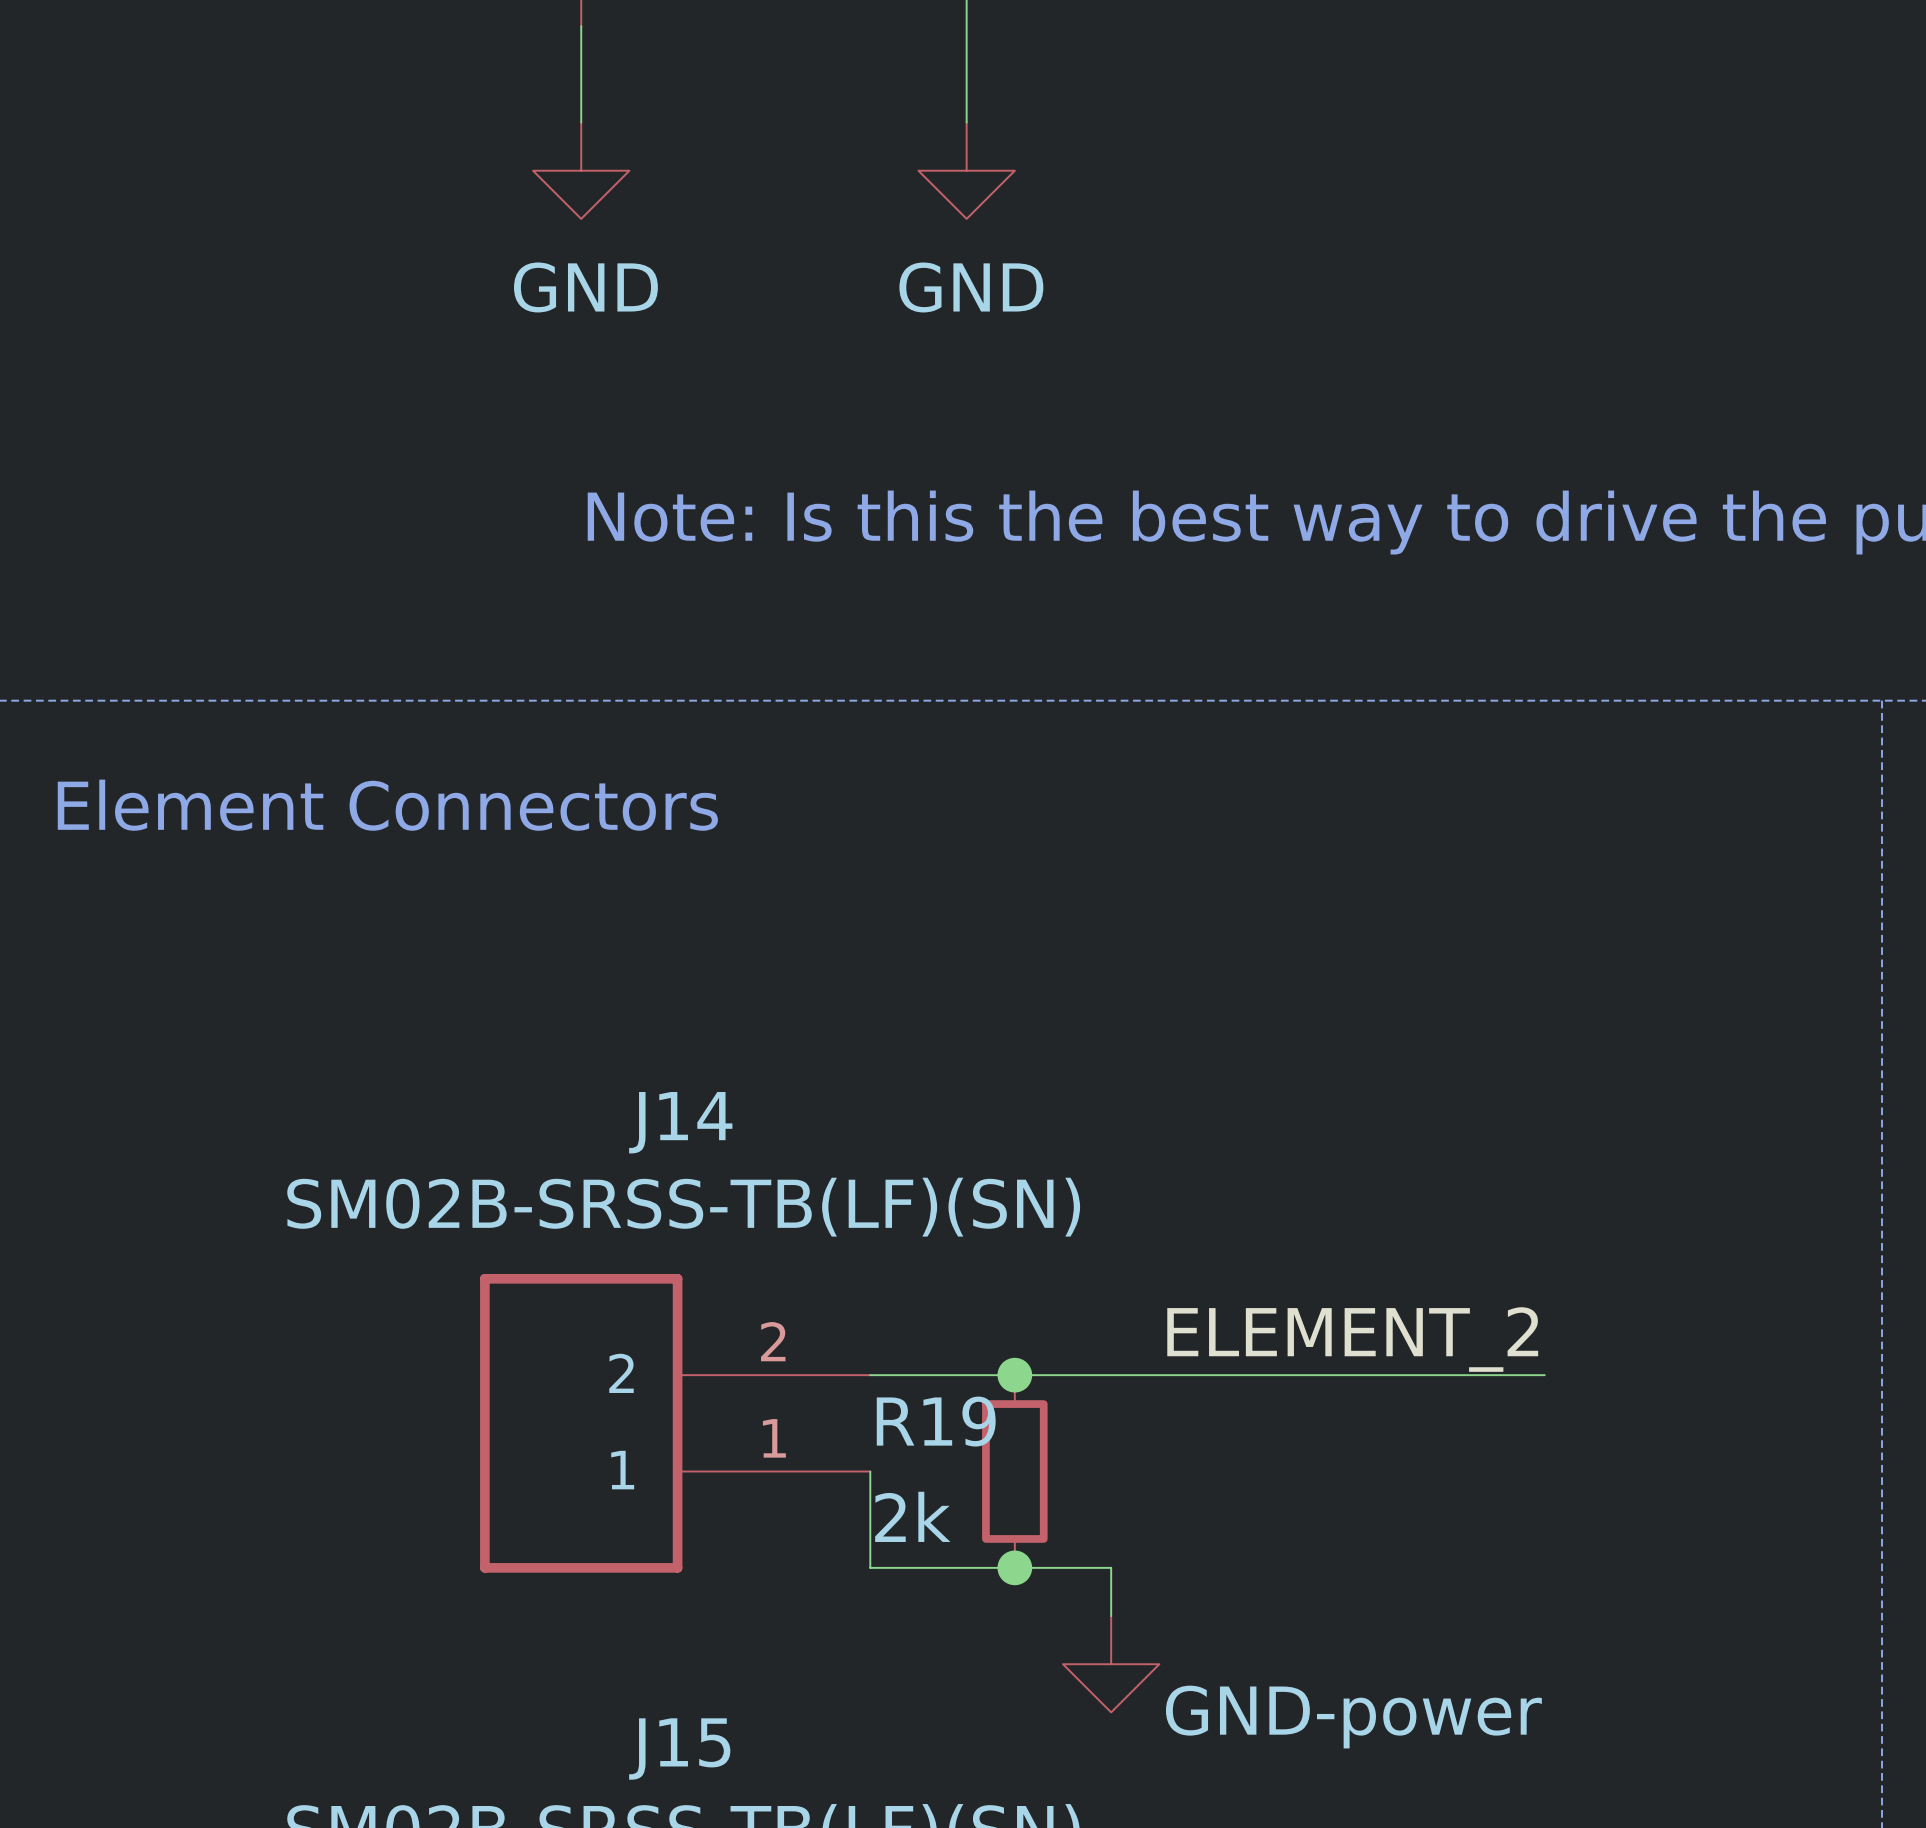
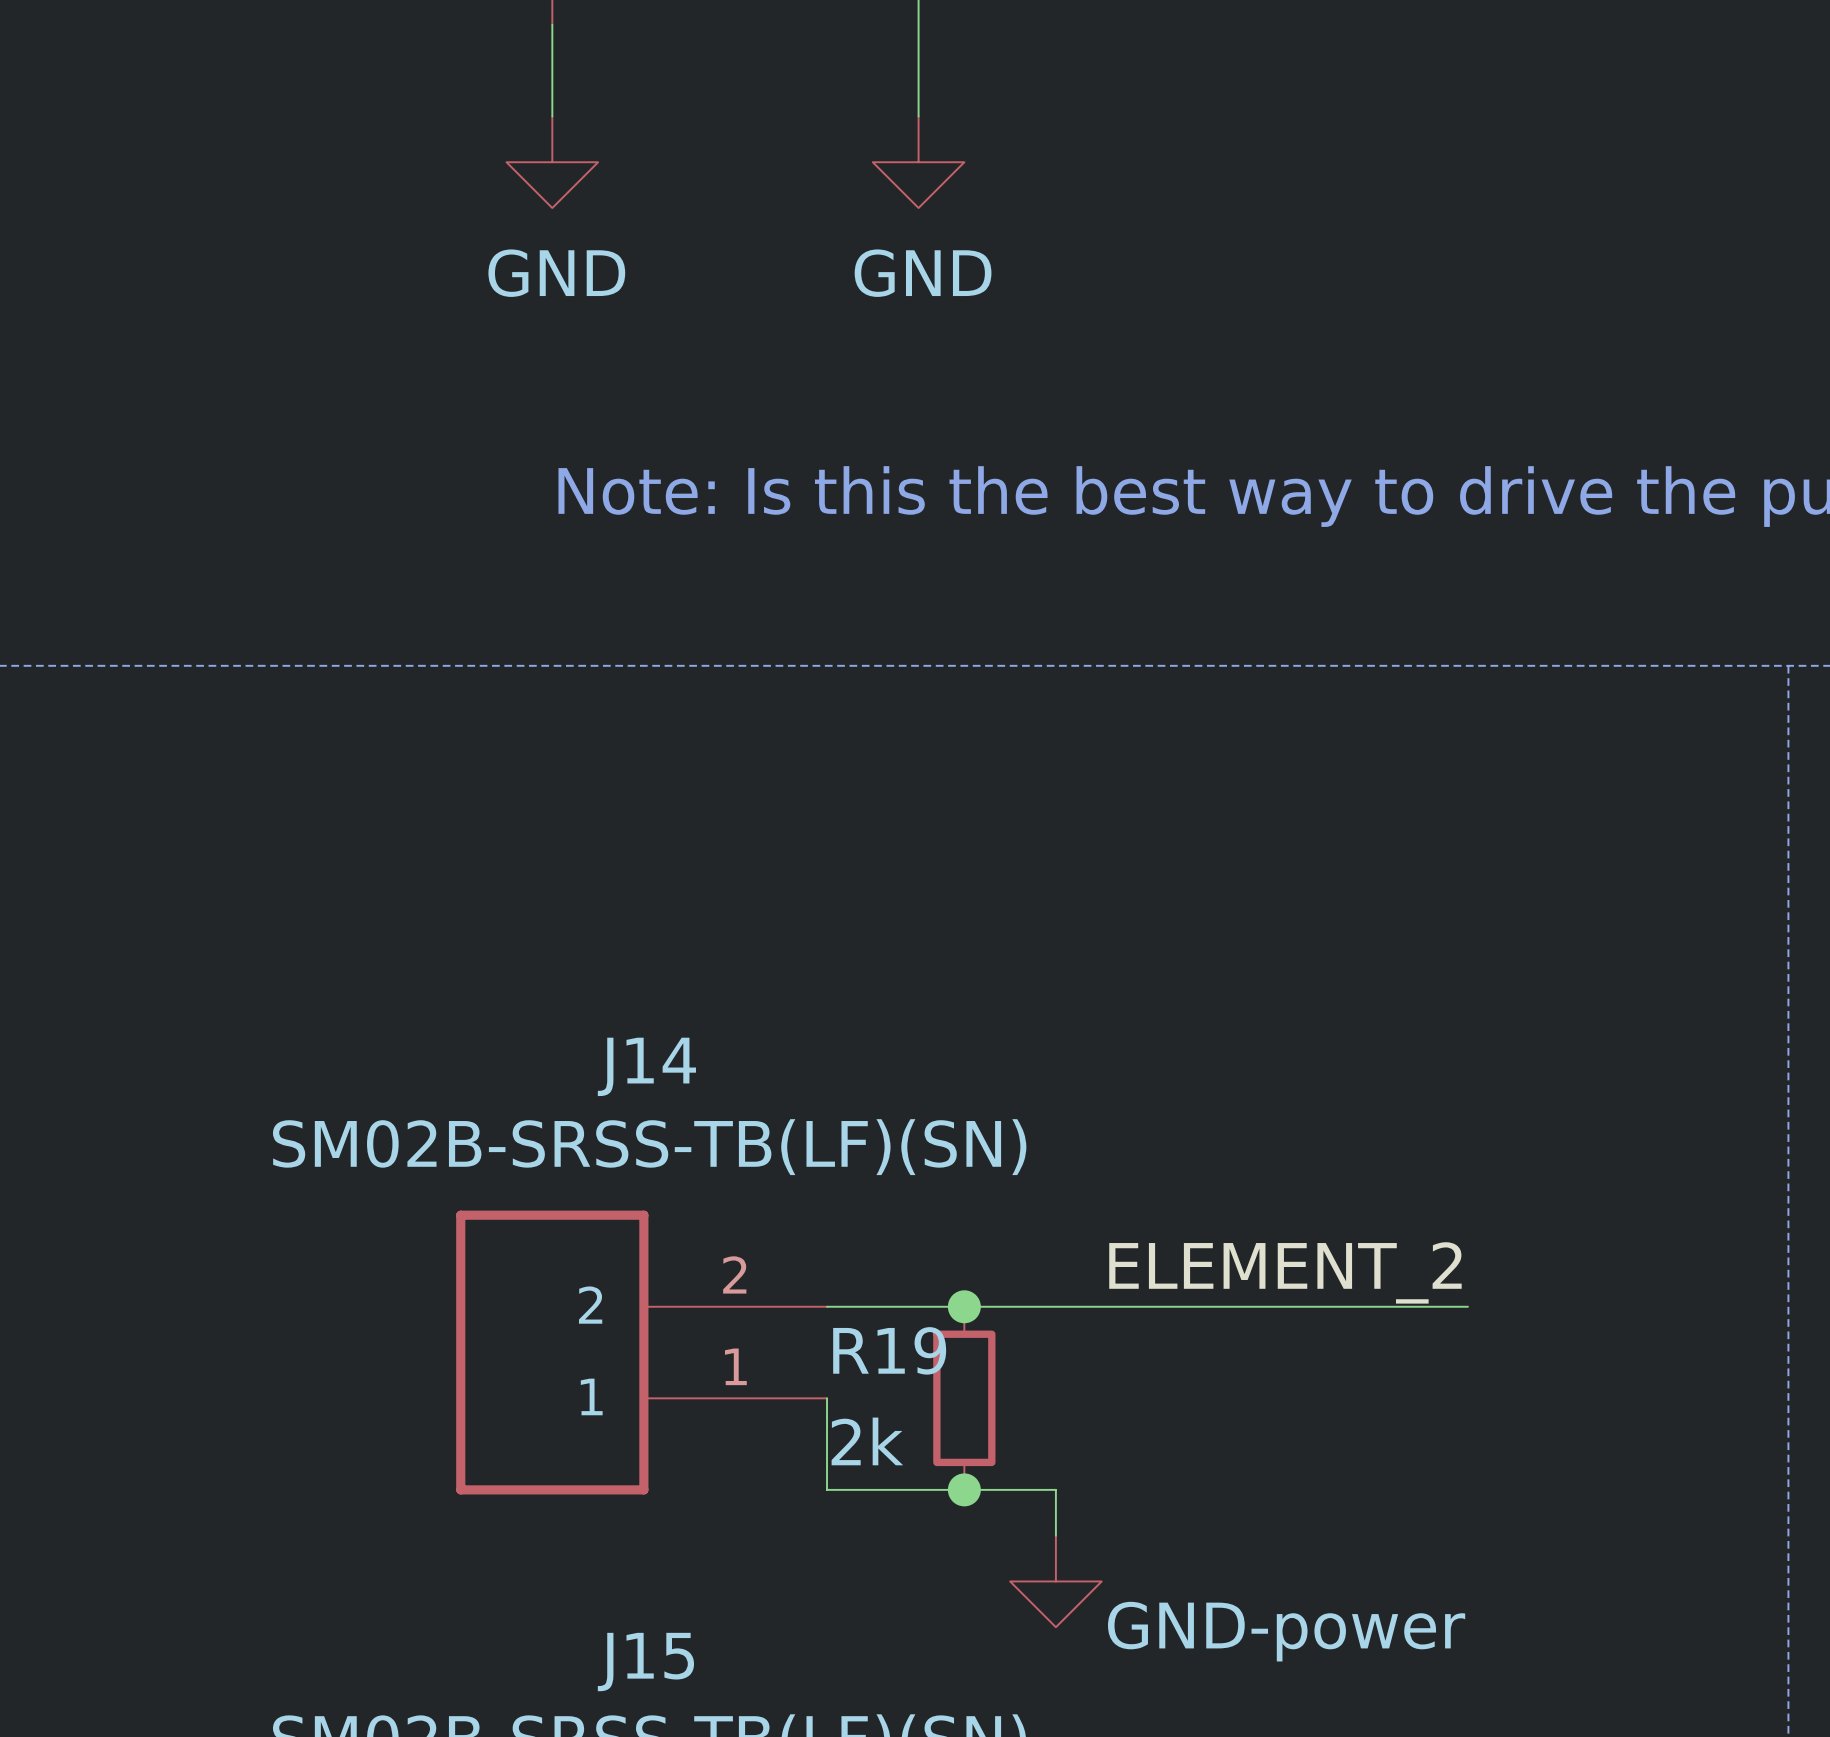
text: Element Connectors (387, 805) -> none

